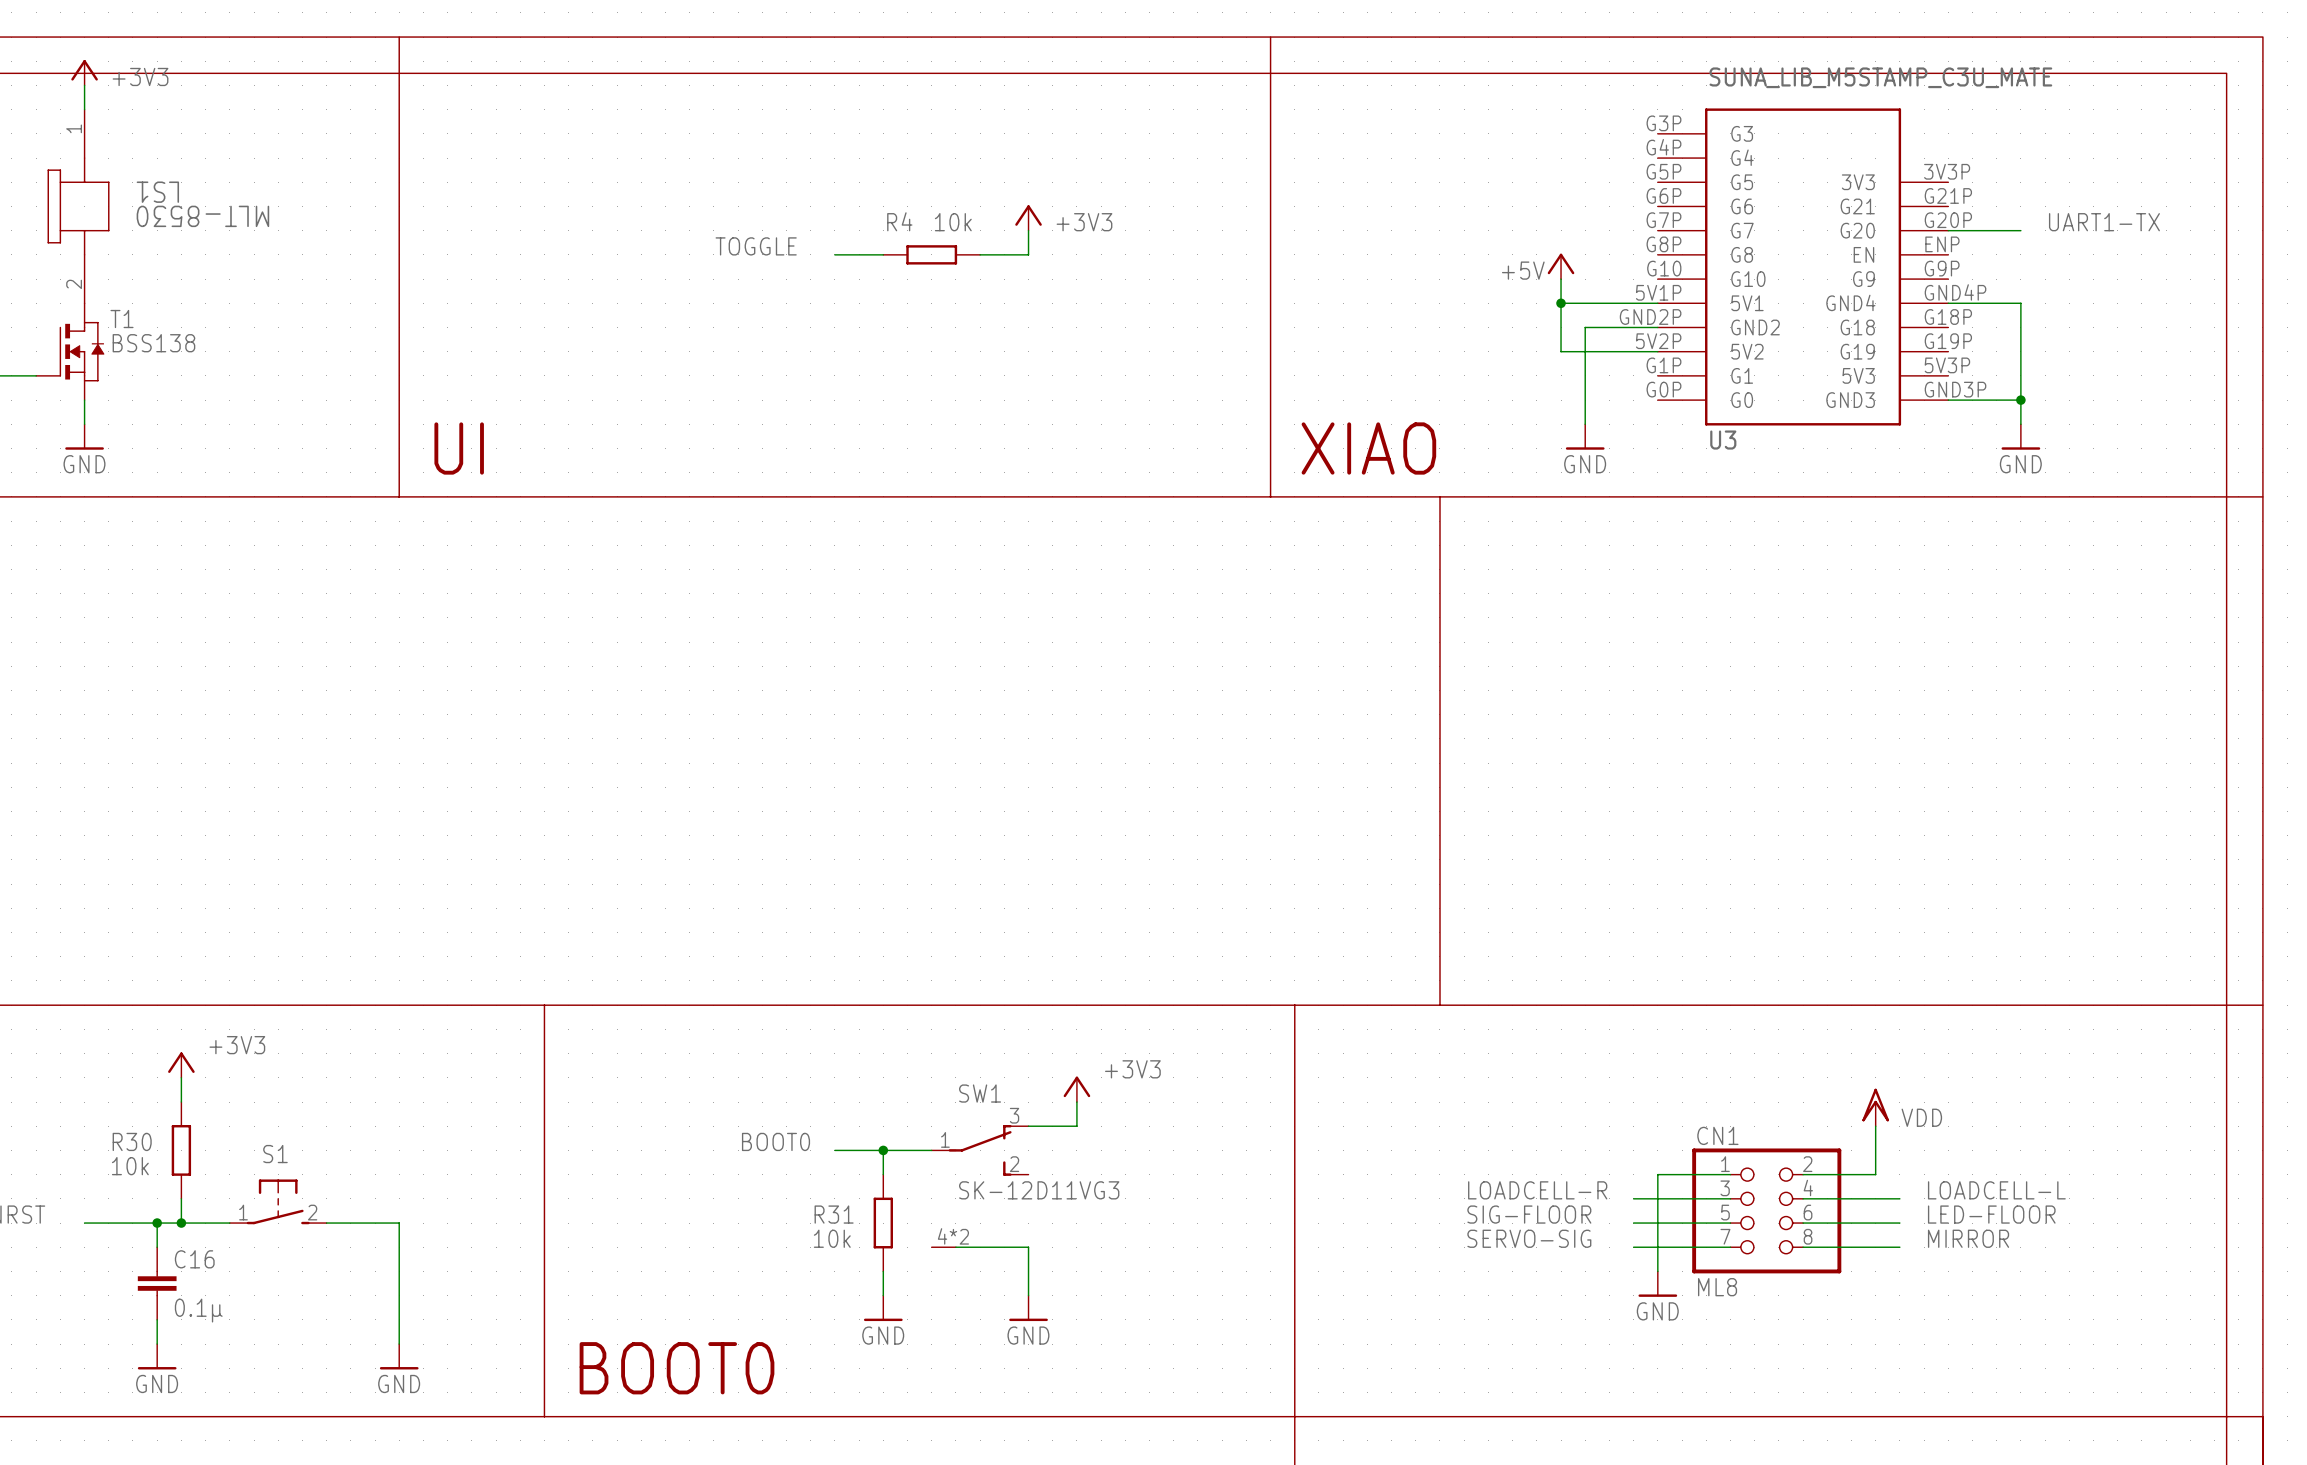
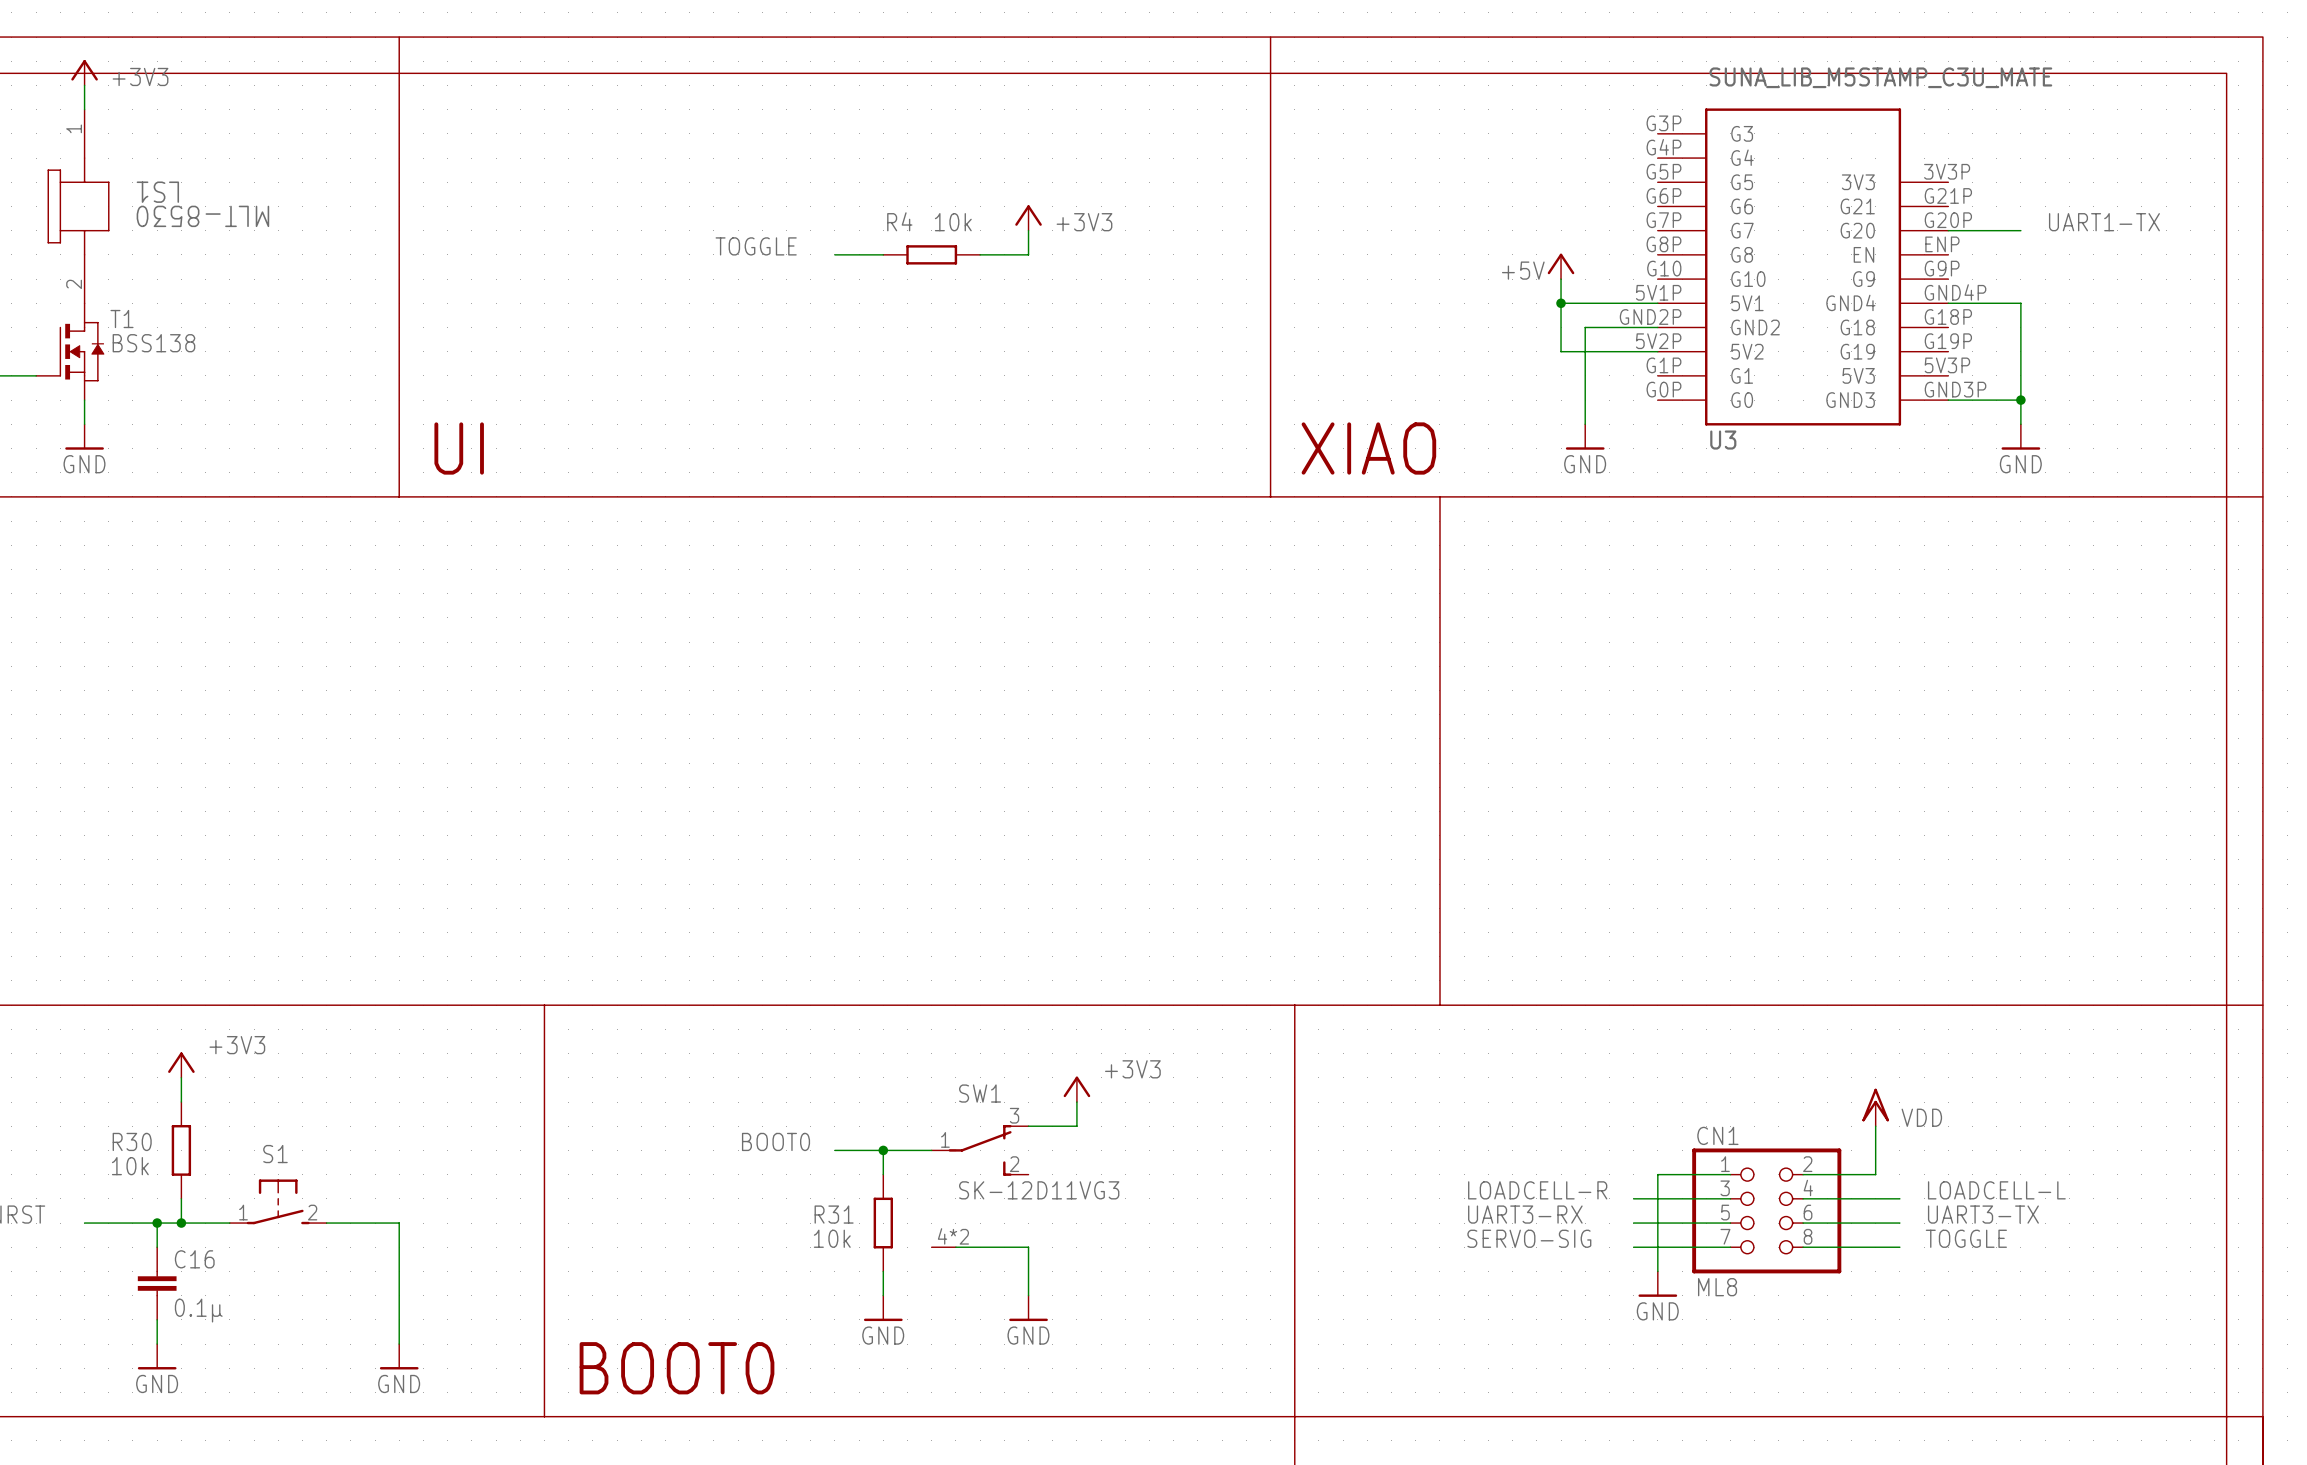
label: SIG-FLOOR (1529, 1214) -> UART3-RX (1525, 1214)
label: LED-FLOOR (1991, 1214) -> UART3-TX (1983, 1214)
label: MIRROR (1968, 1238) -> TOGGLE (1966, 1238)

